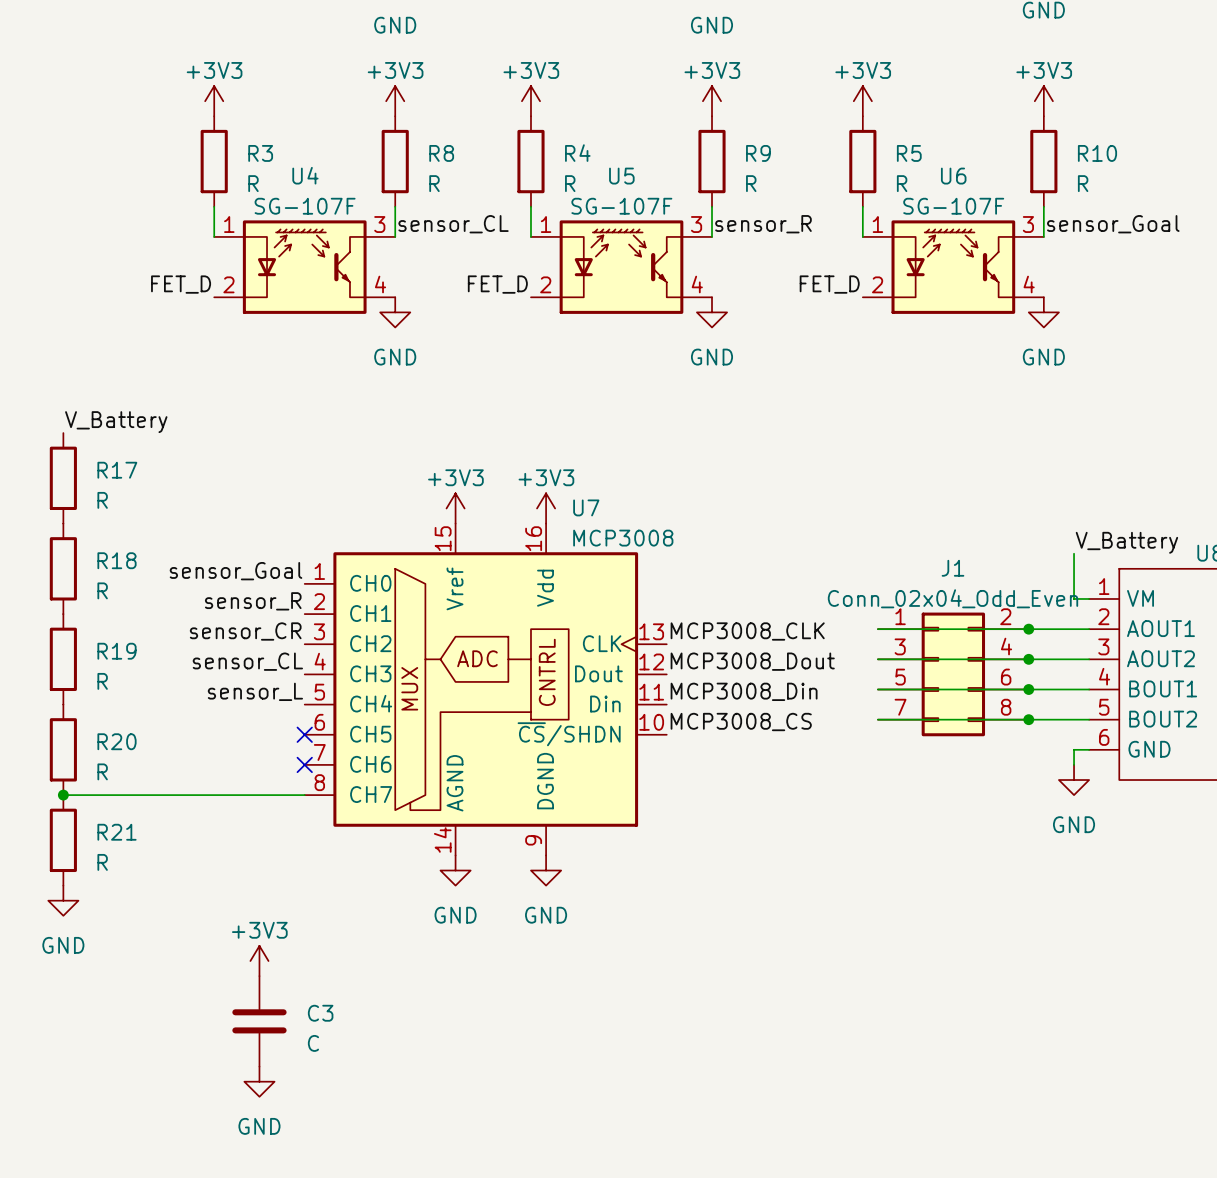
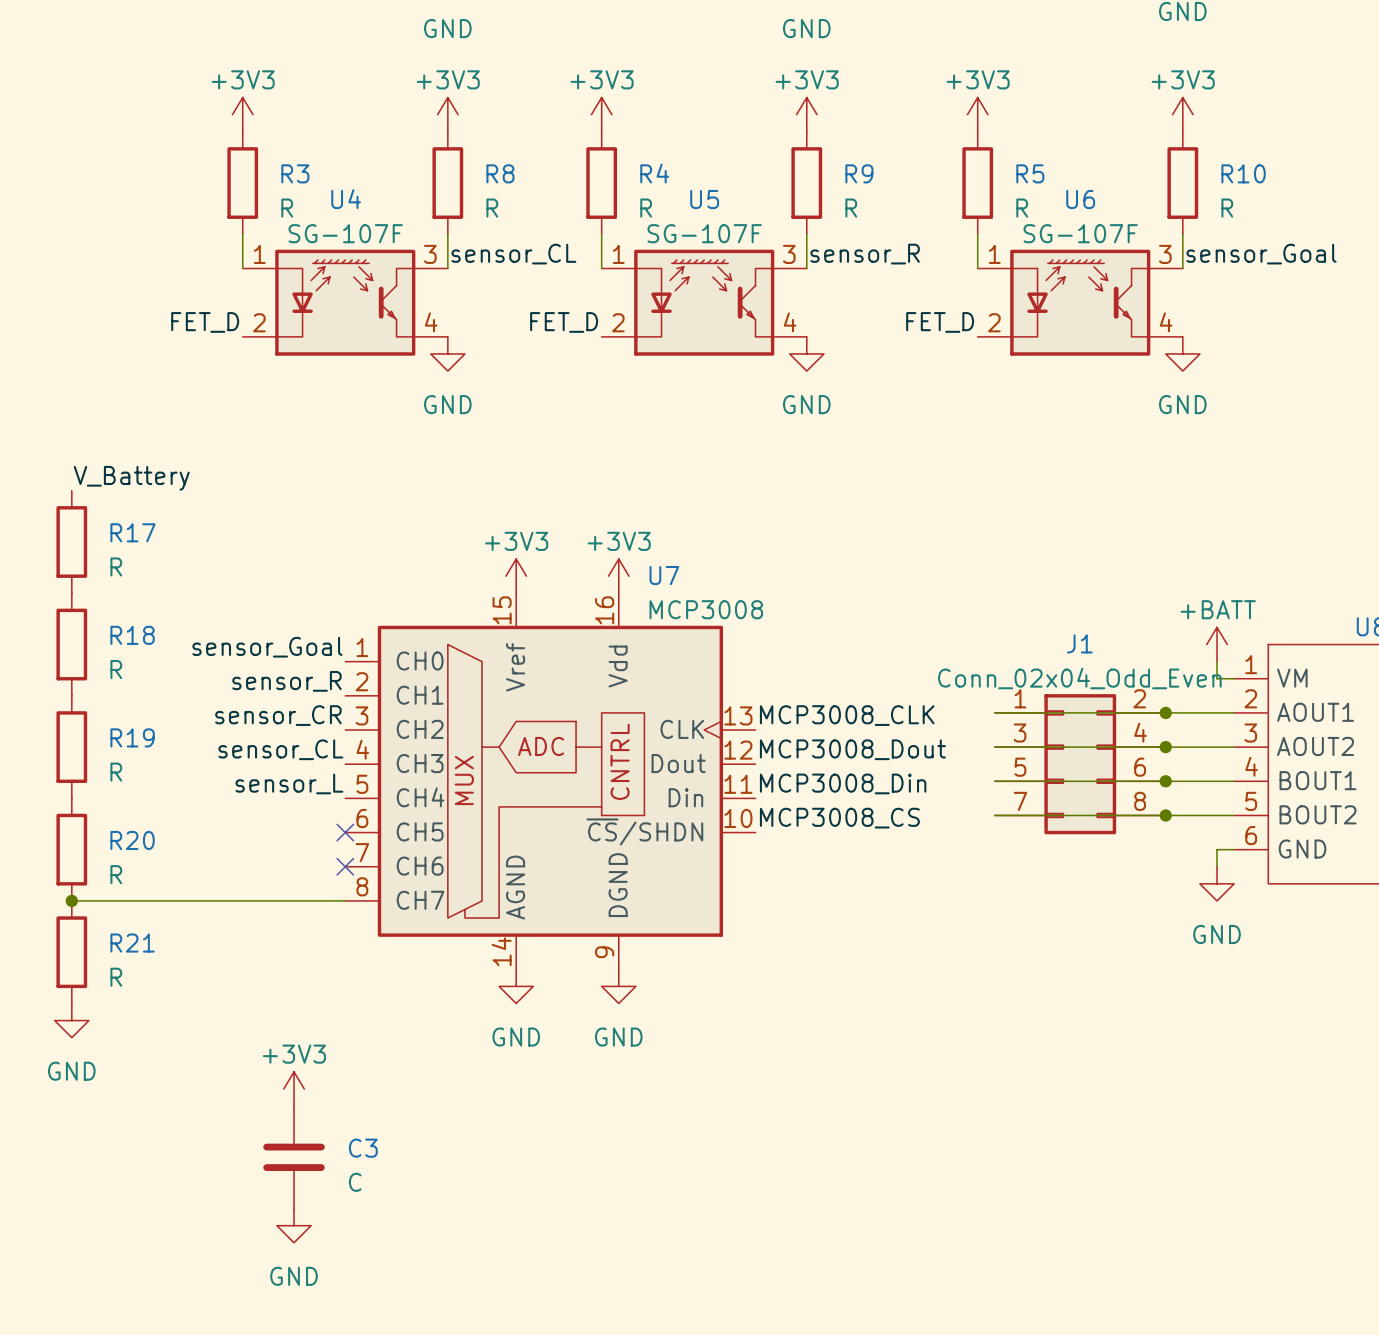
label: V_Battery (1126, 542) -> none
power symbol: none -> +BATT (1217, 644)

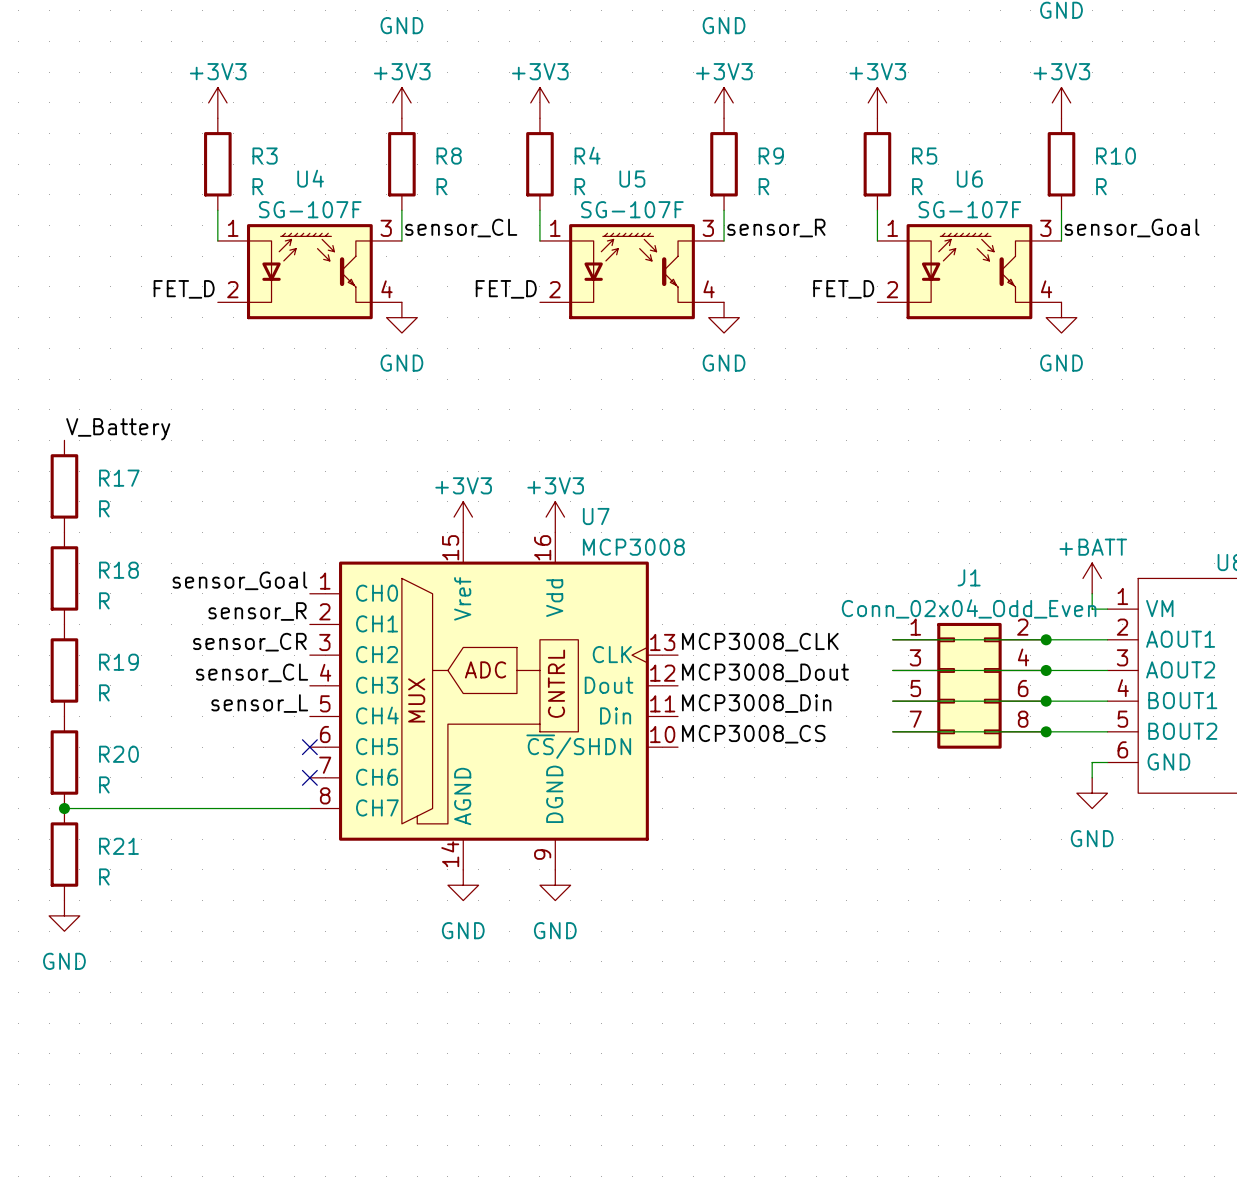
power symbol: +3V3 (294, 1088) -> none
C3: C (294, 1157) -> none
power symbol: GND (294, 1225) -> none

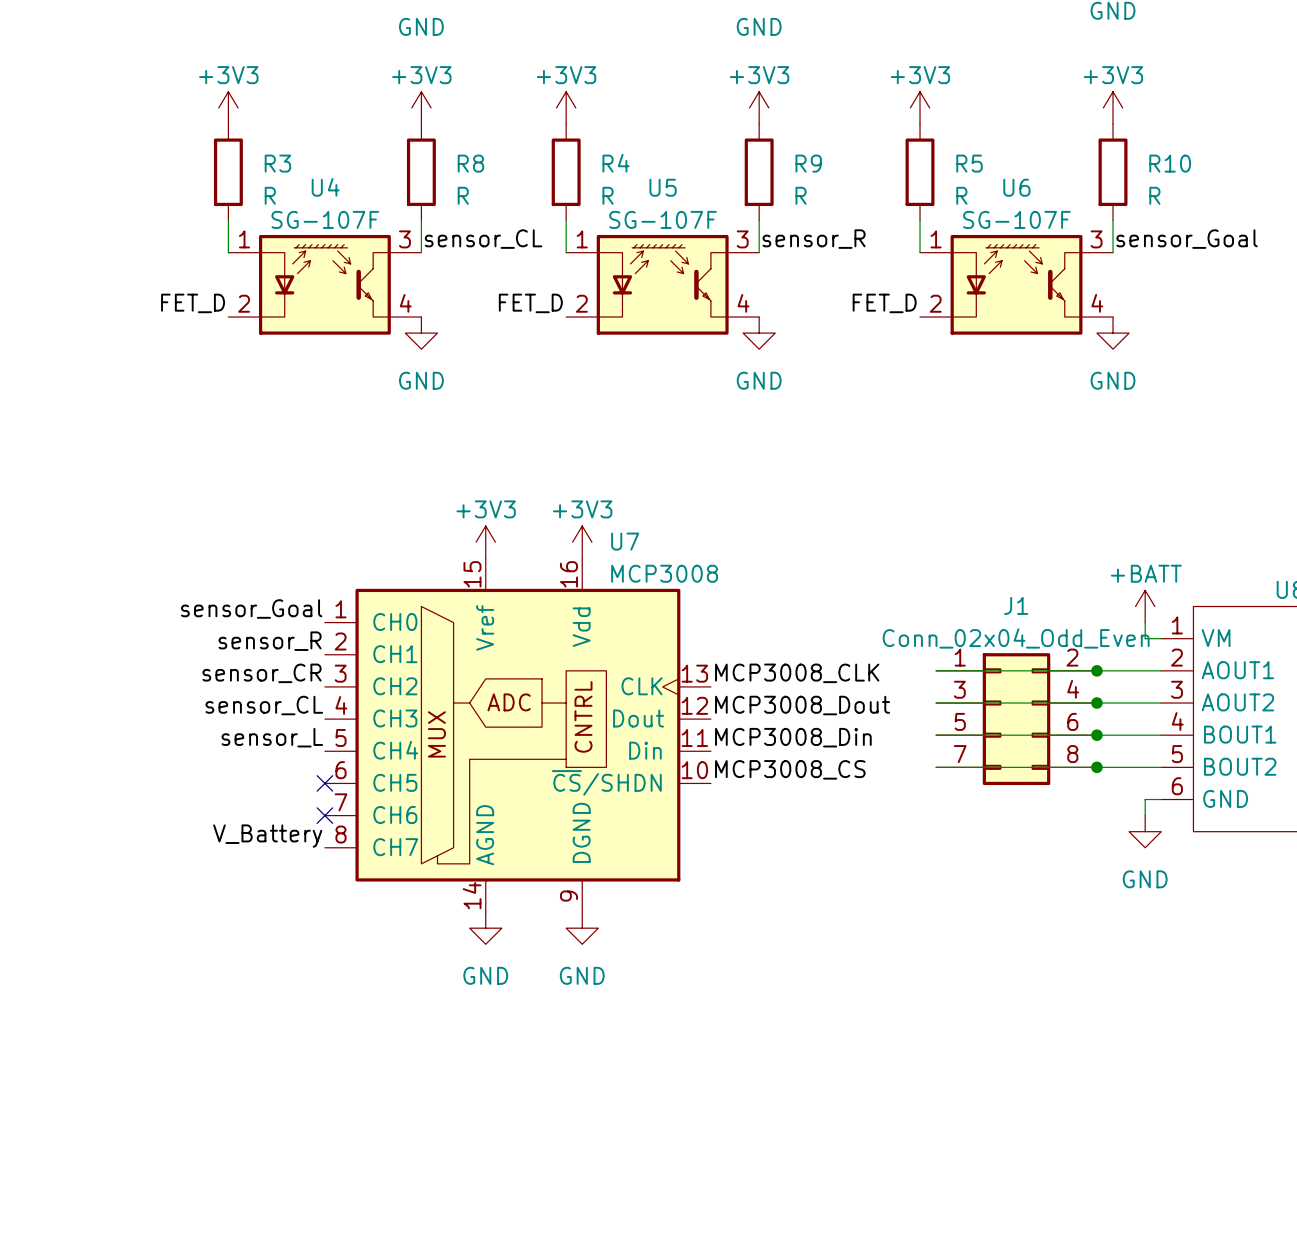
label: V_Battery (118, 429) -> none
R17: R (64, 486) -> none
R18: R (64, 578) -> none
R19: R (64, 670) -> none
R20: R (64, 762) -> none
label: none -> V_Battery (267, 836)
wire: (64, 808) (309, 808) -> none
junction: (64, 808) -> none
R21: R (64, 854) -> none
power symbol: GND (64, 915) -> none

